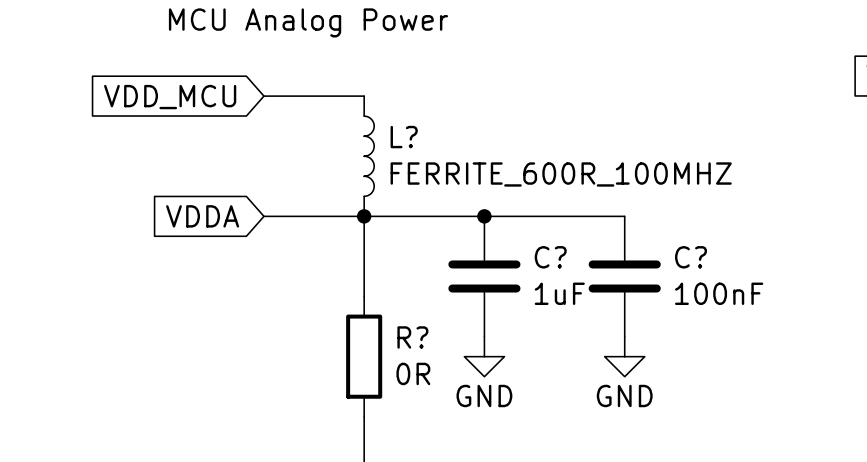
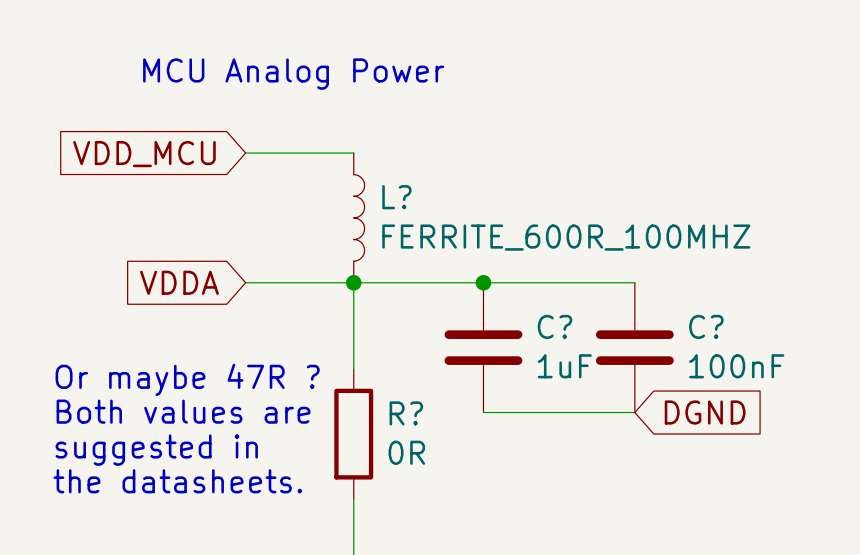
text: none -> Or maybe 47R ? (187, 379)
text: none -> Both values are (183, 411)
wire: none -> (483, 412) (634, 412)
global label: none -> DGND (705, 412)
power symbol: GND (484, 356) -> none
power symbol: GND (624, 356) -> none
text: none -> suggested in (156, 450)
text: none -> the datasheets. (177, 481)

